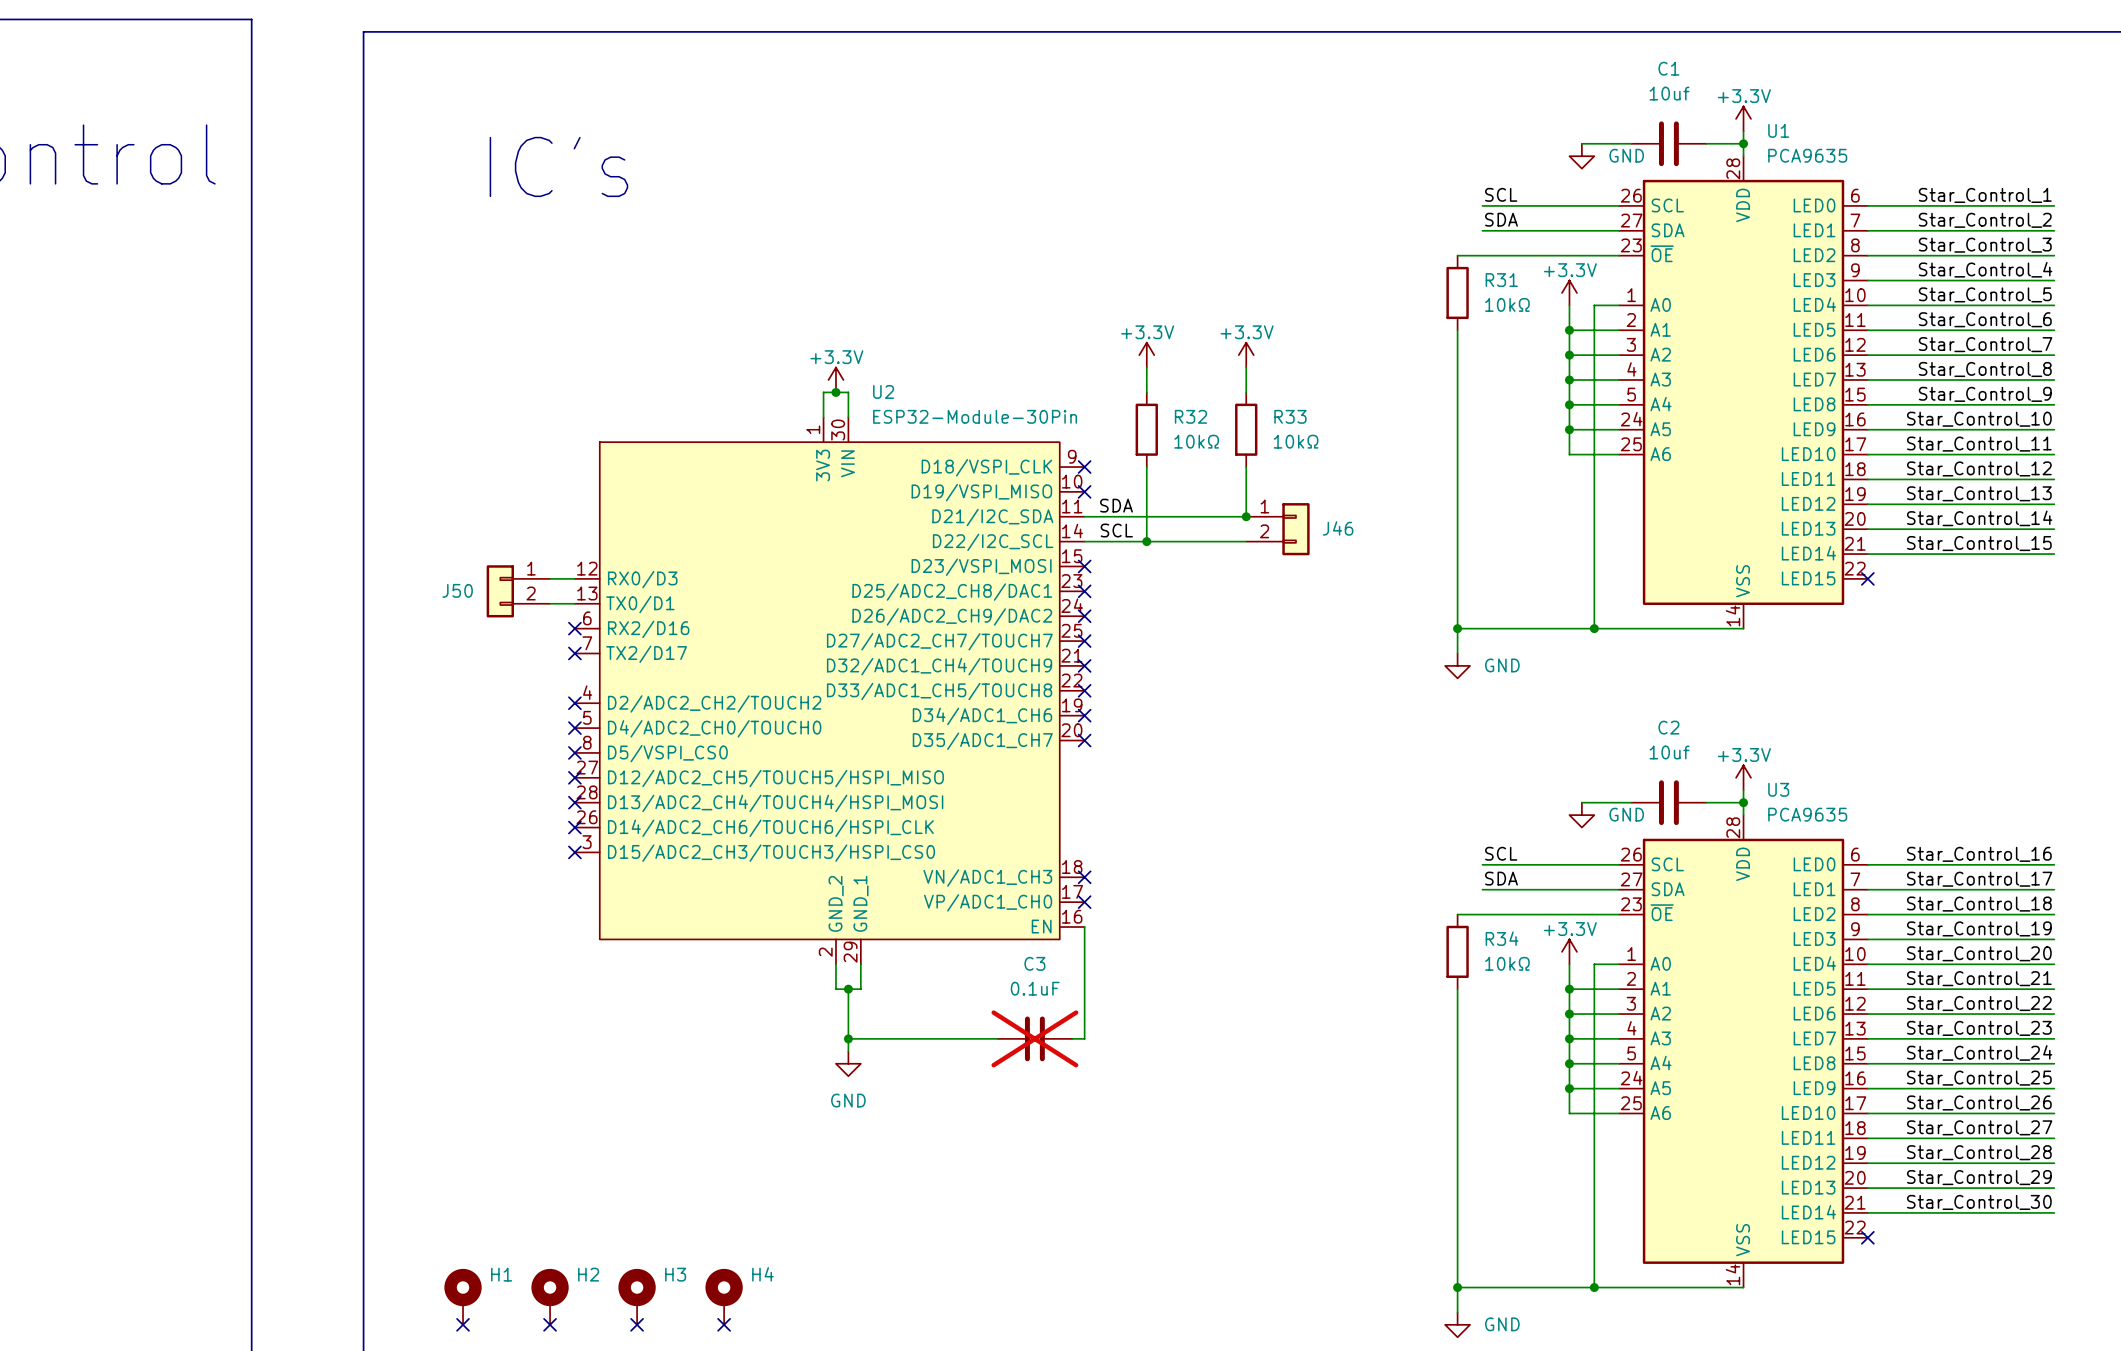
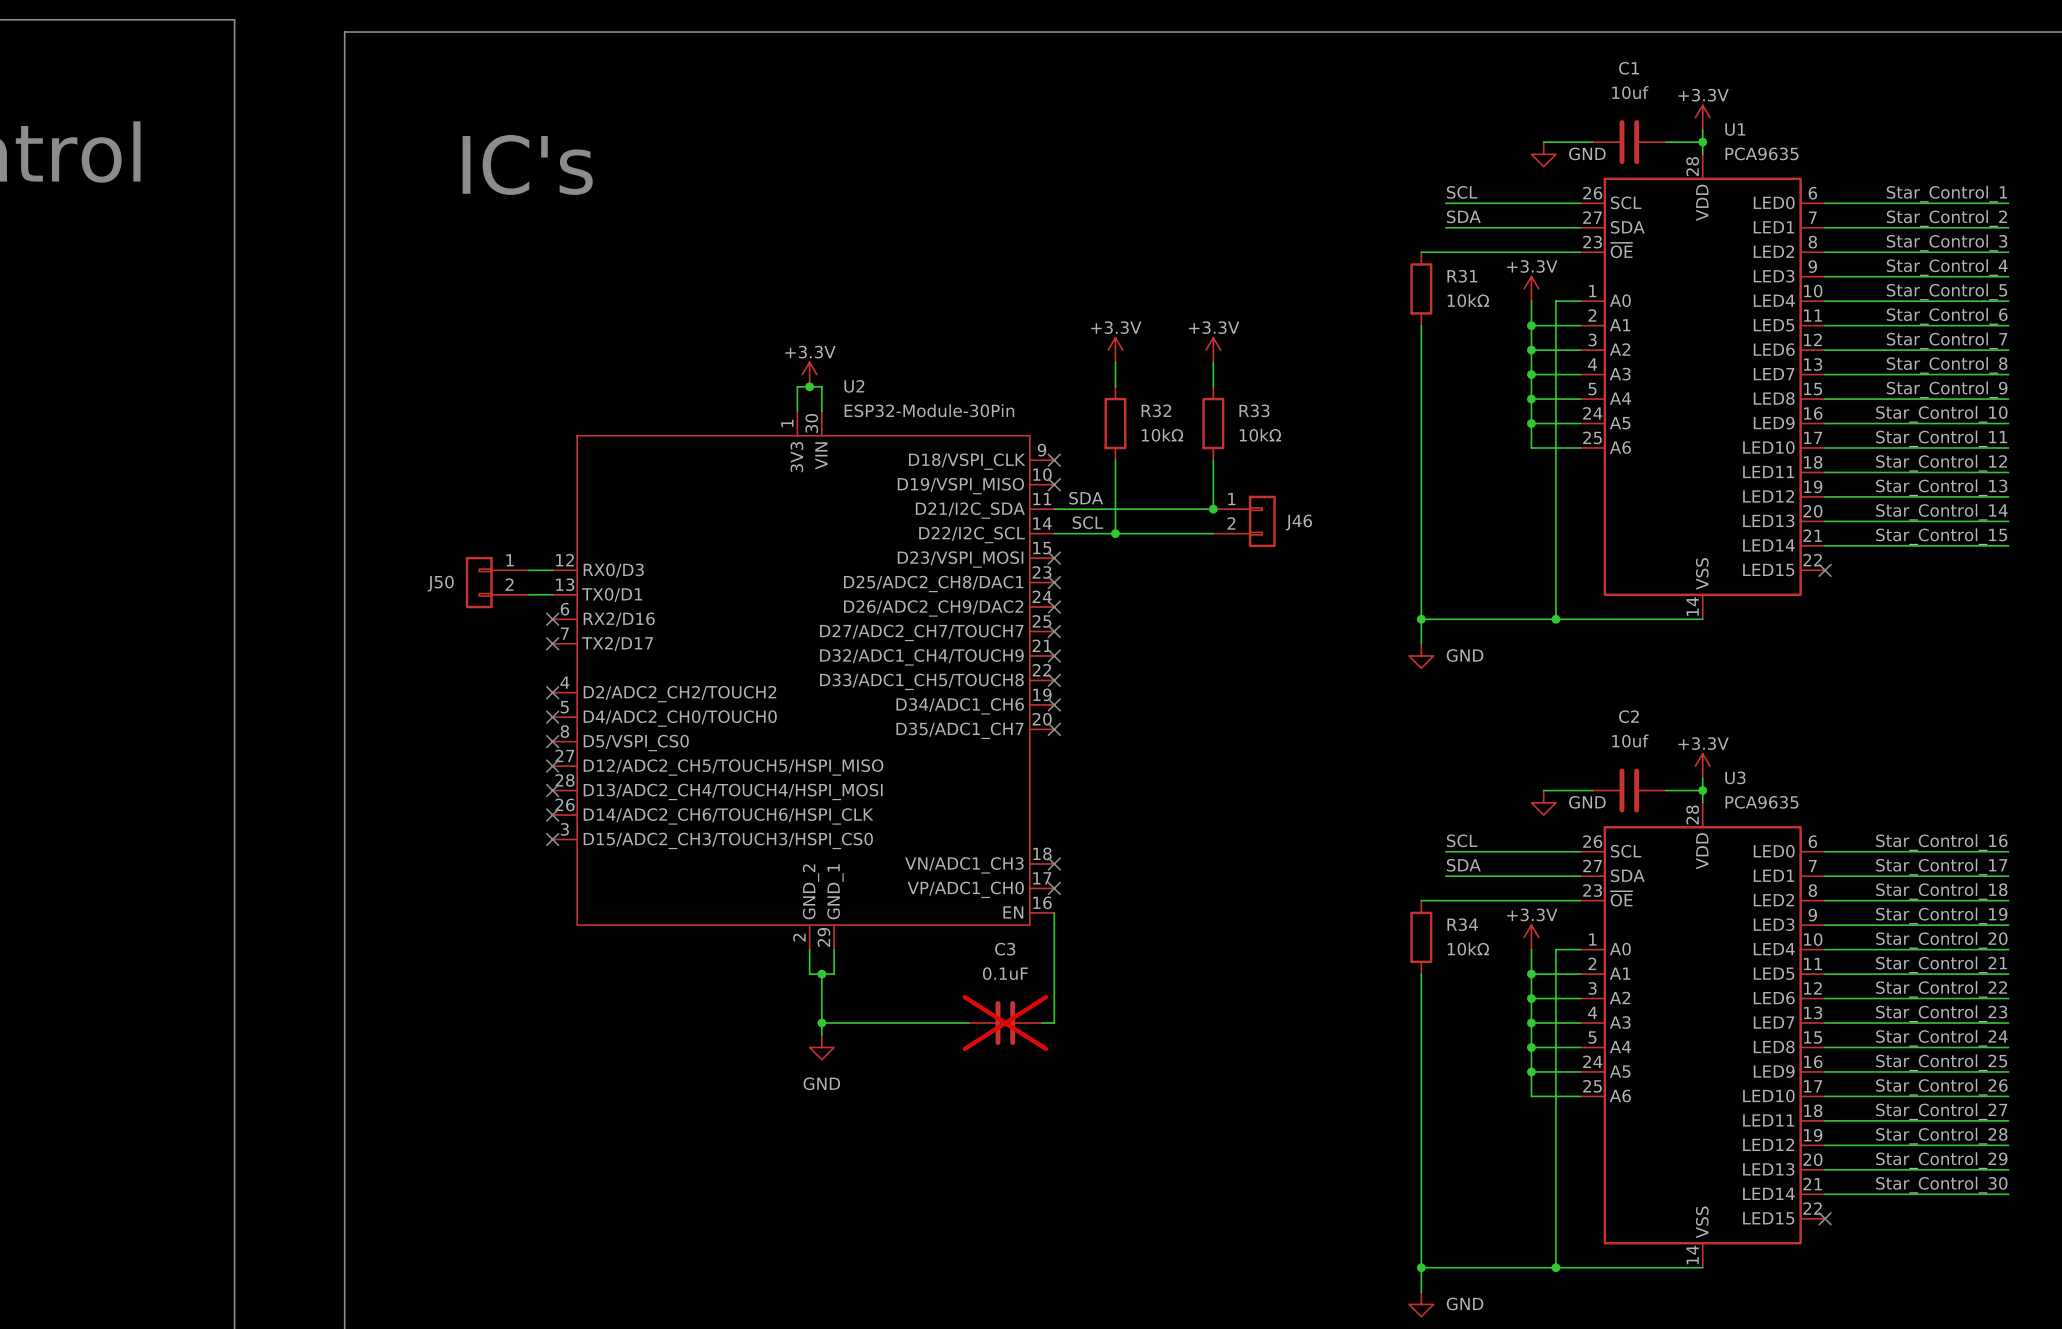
H1: (463, 1296) -> none
H2: (550, 1296) -> none
H3: (637, 1296) -> none
H4: (724, 1296) -> none
no-connect mark: (463, 1324) -> none
no-connect mark: (550, 1324) -> none
no-connect mark: (637, 1324) -> none
no-connect mark: (724, 1324) -> none

